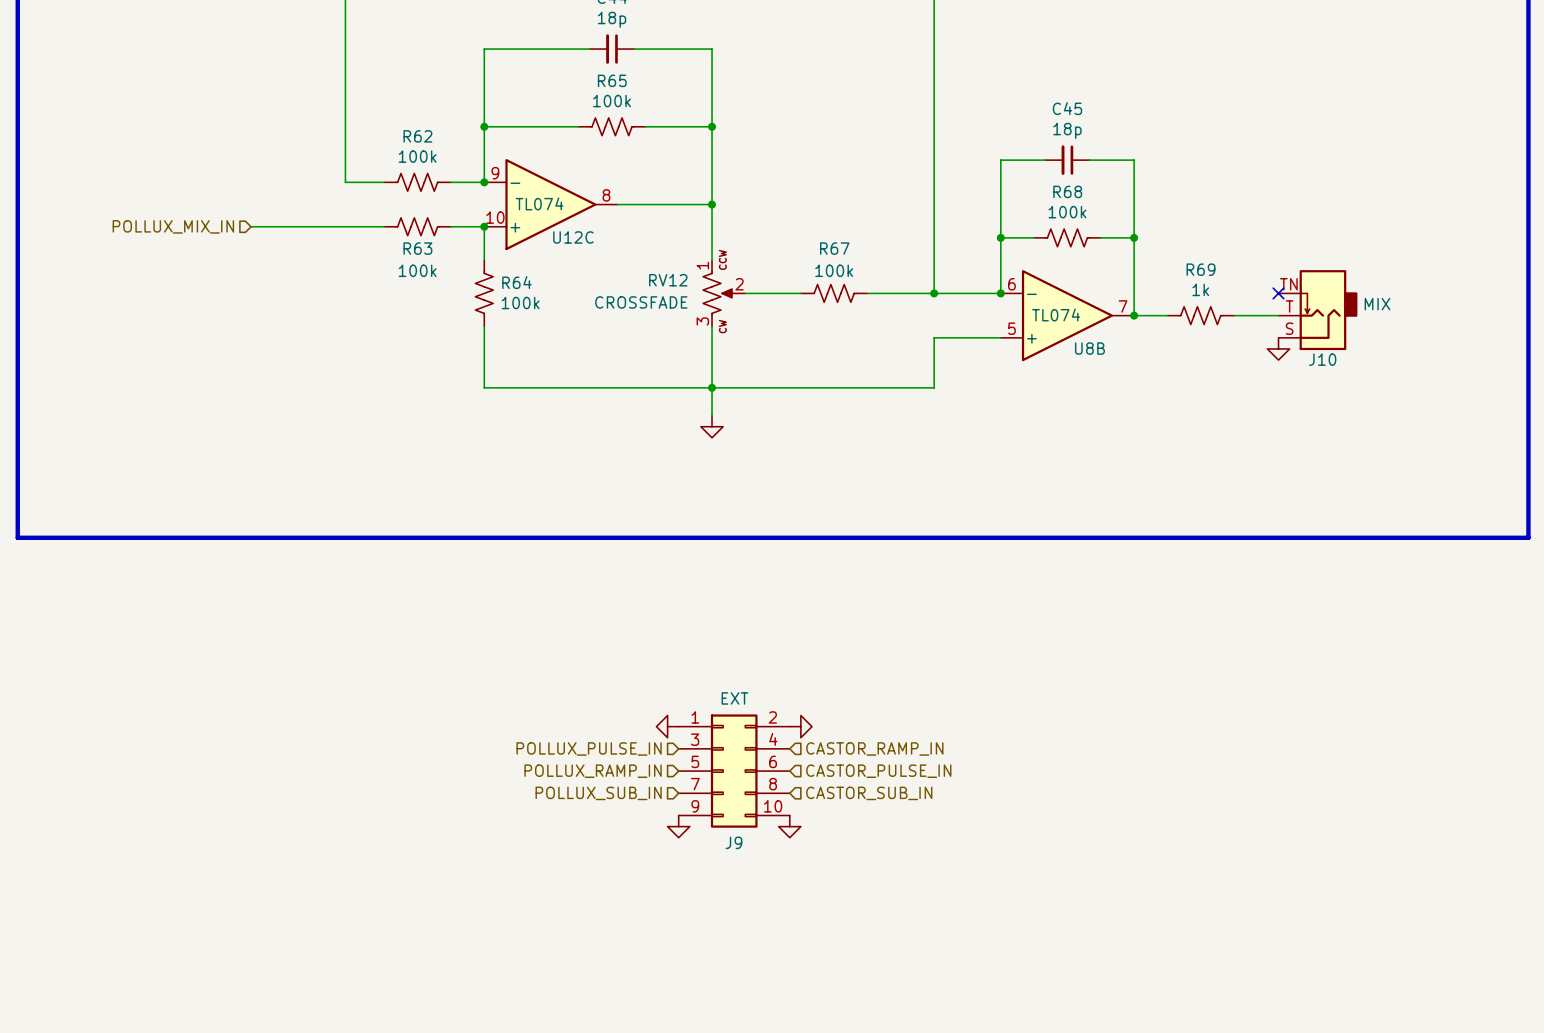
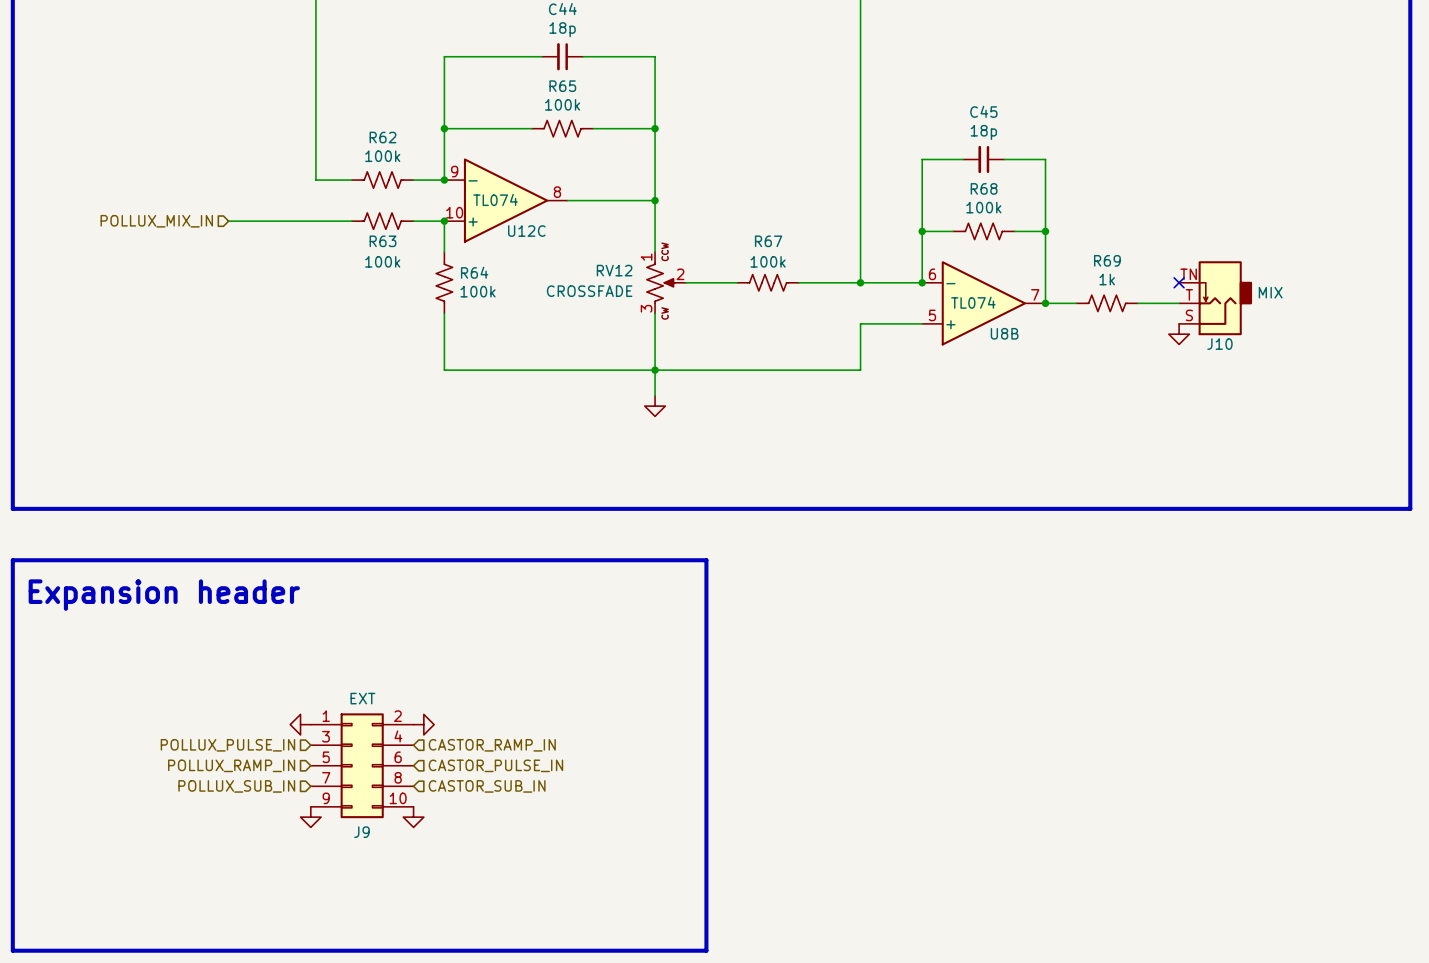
line: none -> (12, 560) (12, 950) (706, 950) (706, 560) (12, 560)
text: none -> Expansion header (164, 595)
power symbol: (667, 726) -> none
power symbol: (800, 726) -> none
hierarchical label: POLLUX_PULSE_IN (589, 748) -> none
hierarchical label: CASTOR_RAMP_IN (874, 748) -> none
power symbol: none -> (300, 724)
power symbol: none -> (423, 724)
hierarchical label: POLLUX_RAMP_IN (593, 771) -> CASTOR_RAMP_IN (492, 745)
J9 position: (734, 771) -> (362, 765)
hierarchical label: CASTOR_PULSE_IN (878, 771) -> none
hierarchical label: none -> POLLUX_PULSE_IN (227, 745)
hierarchical label: POLLUX_SUB_IN (598, 793) -> none
hierarchical label: CASTOR_SUB_IN (869, 793) -> none
hierarchical label: none -> POLLUX_RAMP_IN (231, 765)
hierarchical label: none -> CASTOR_PULSE_IN (495, 765)
power symbol: (678, 826) -> none
power symbol: (789, 826) -> none
hierarchical label: none -> POLLUX_SUB_IN (236, 786)
hierarchical label: none -> CASTOR_SUB_IN (487, 786)
power symbol: none -> (310, 817)
power symbol: none -> (413, 817)

